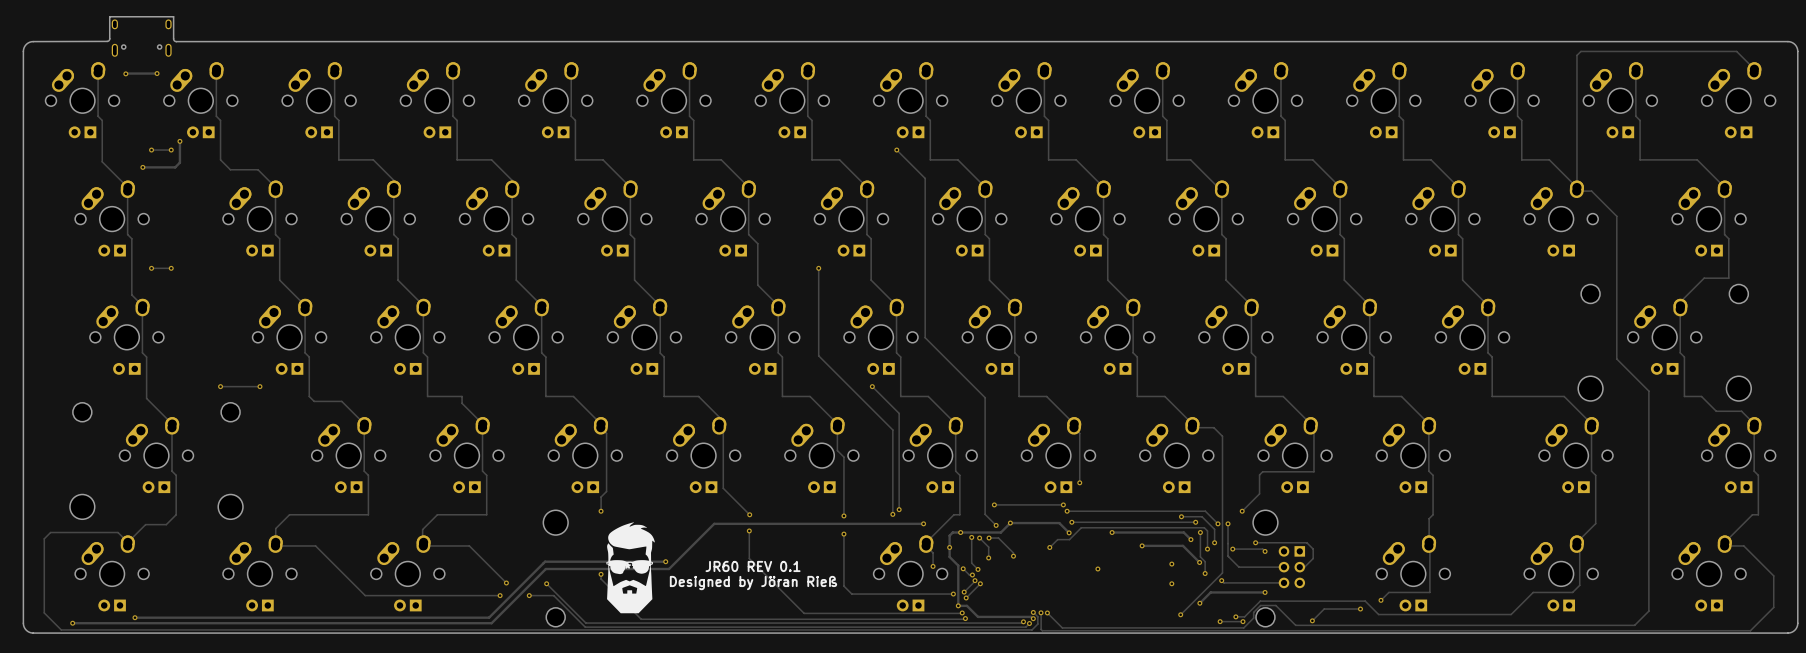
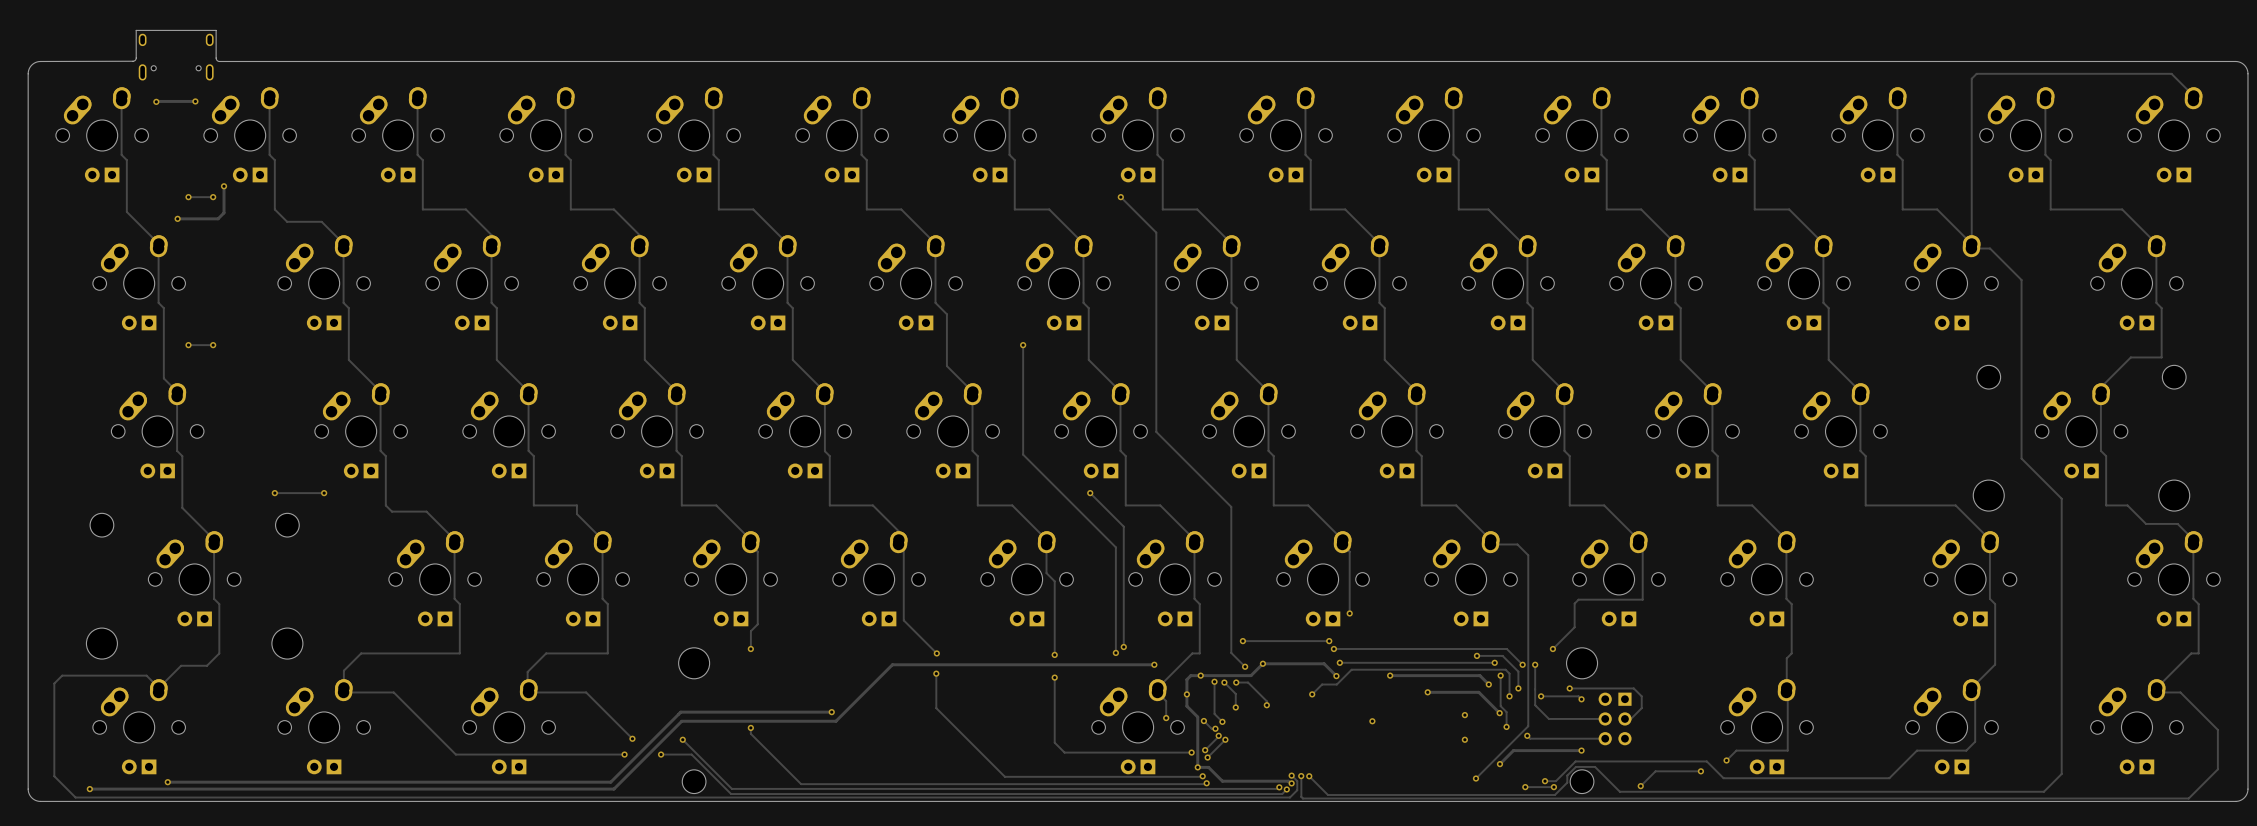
text: JR60 REV 0.1 (753, 566) -> none
part: (630, 567) -> none
text: Designed by Jöran Rieß (753, 583) -> none

